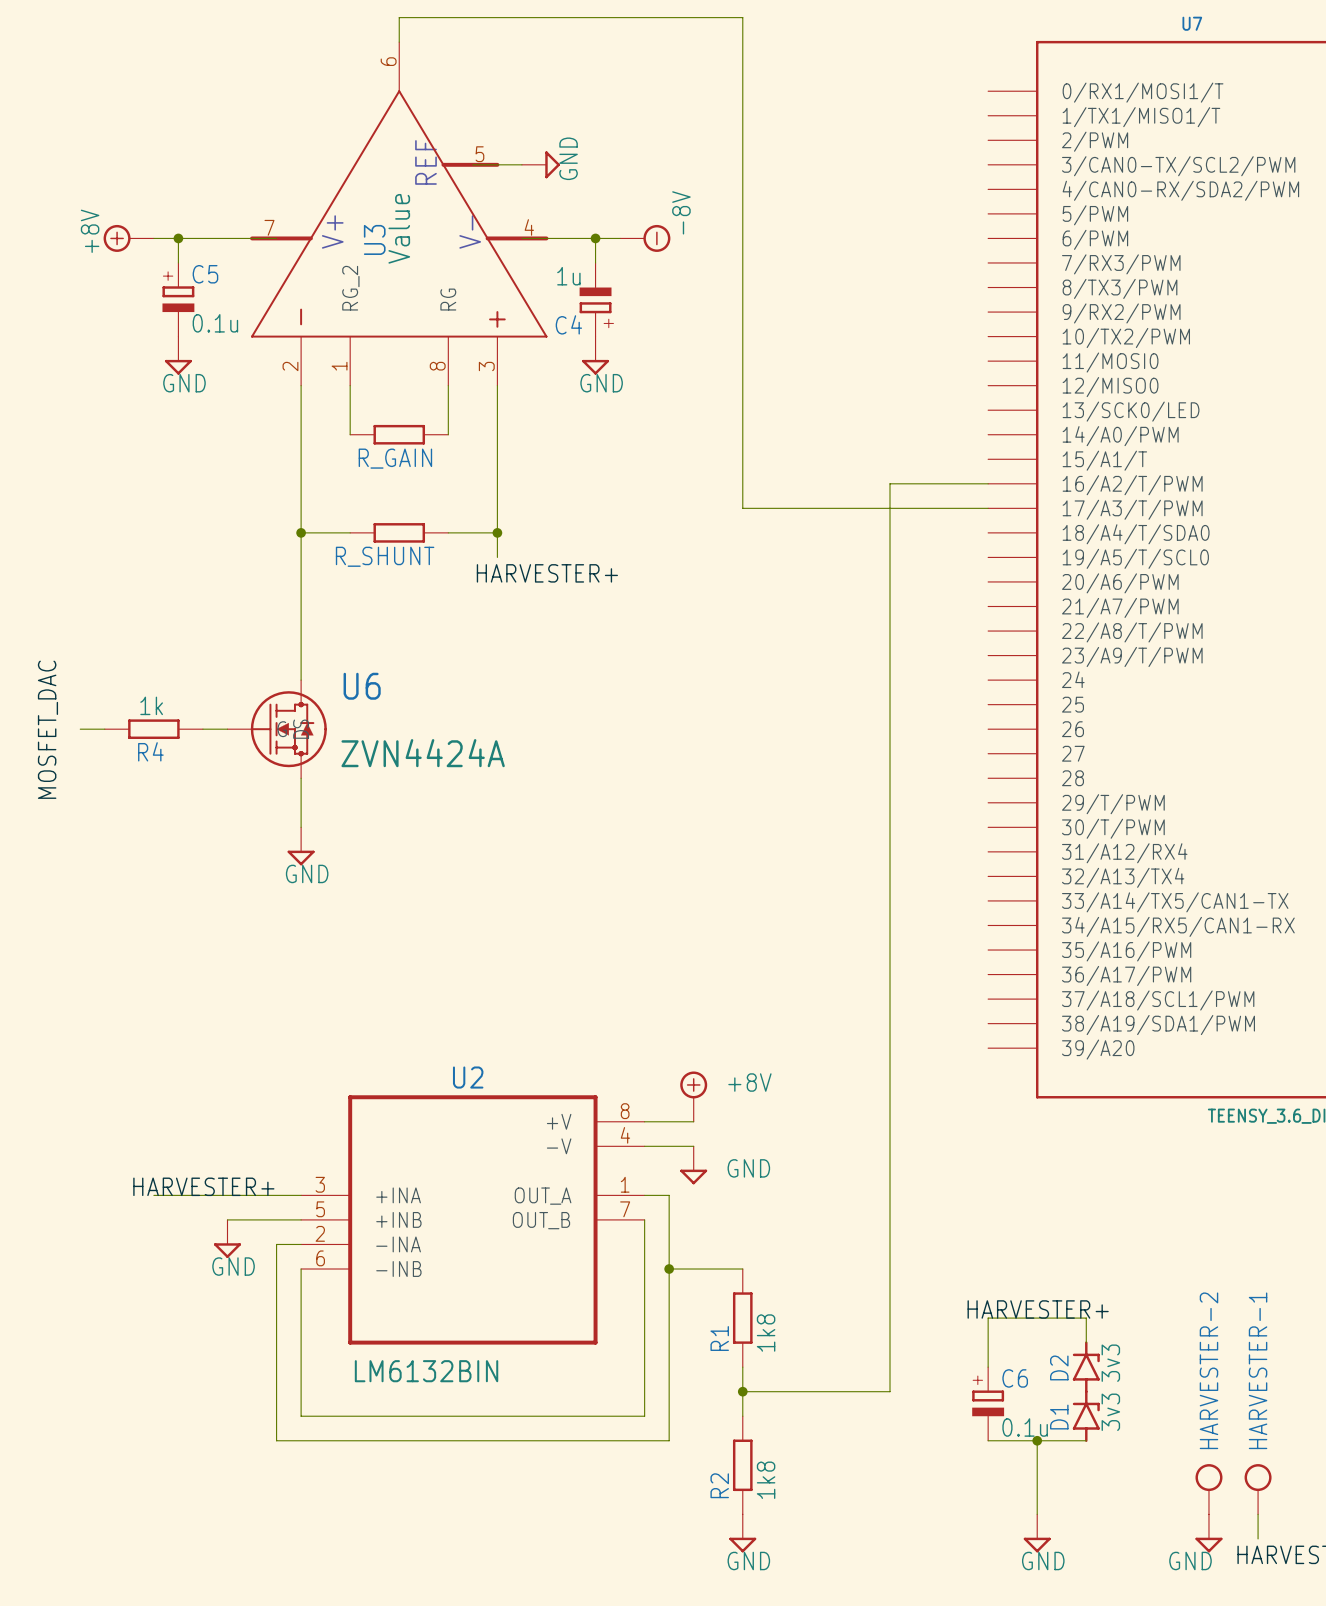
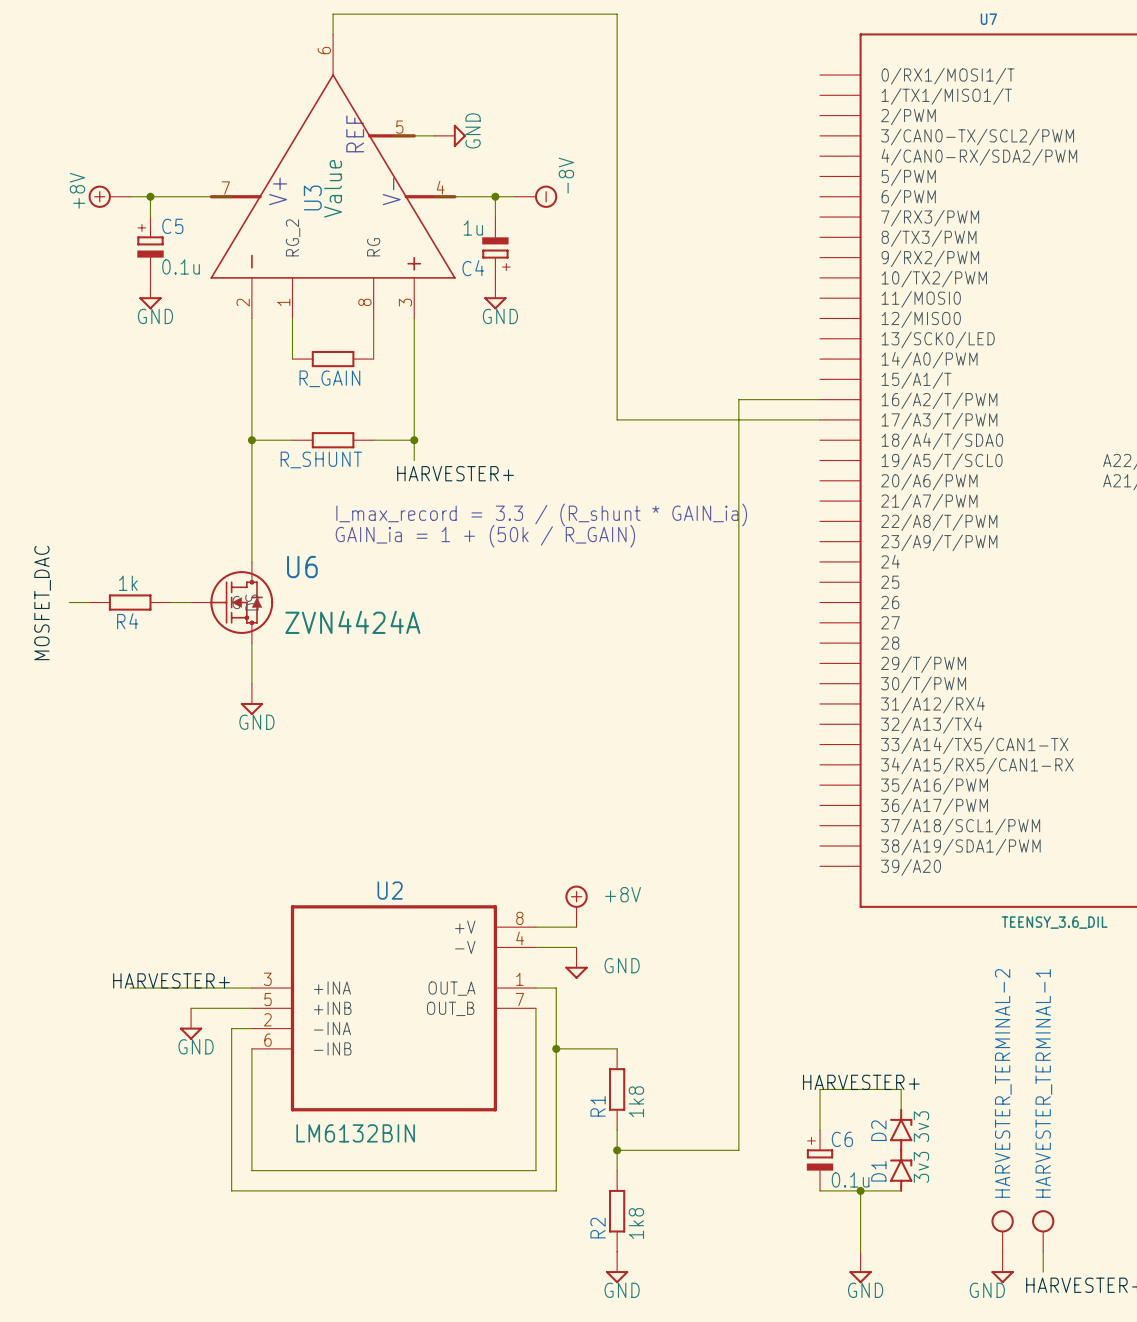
text: none -> I_max_record = 3.3 / (R_shunt * GAIN_ia) (541, 514)
text: none -> GAIN_ia = 1 + (50k / R_GAIN) (485, 536)
HARVESTER-2 name: HARVESTER-2 (1208, 1370) -> HARVESTER_TERMINAL-2 (1003, 1083)
HARVESTER-1 name: HARVESTER-1 (1258, 1370) -> HARVESTER_TERMINAL-1 (1043, 1083)

